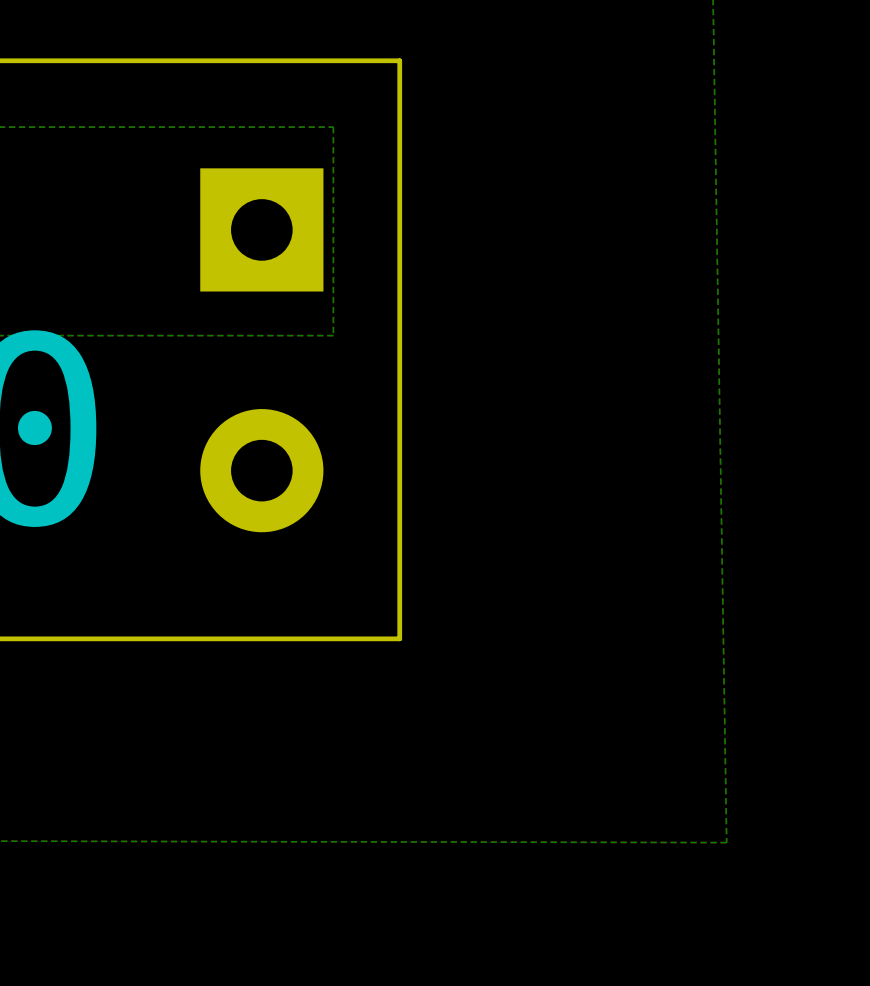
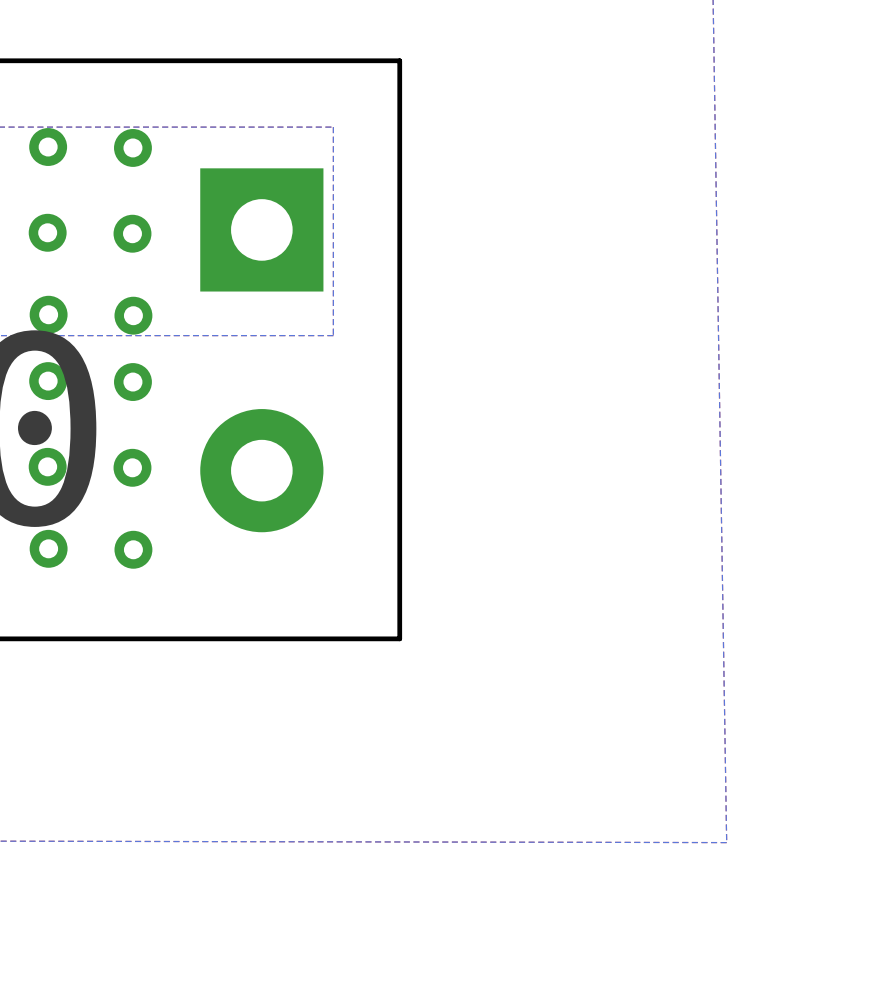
via: none -> (48, 147)
via: none -> (132, 147)
via: none -> (47, 232)
via: none -> (132, 233)
via: none -> (48, 314)
via: none -> (133, 315)
via: none -> (48, 381)
via: none -> (132, 382)
via: none -> (47, 466)
via: none -> (132, 467)
via: none -> (48, 548)
via: none -> (133, 549)

